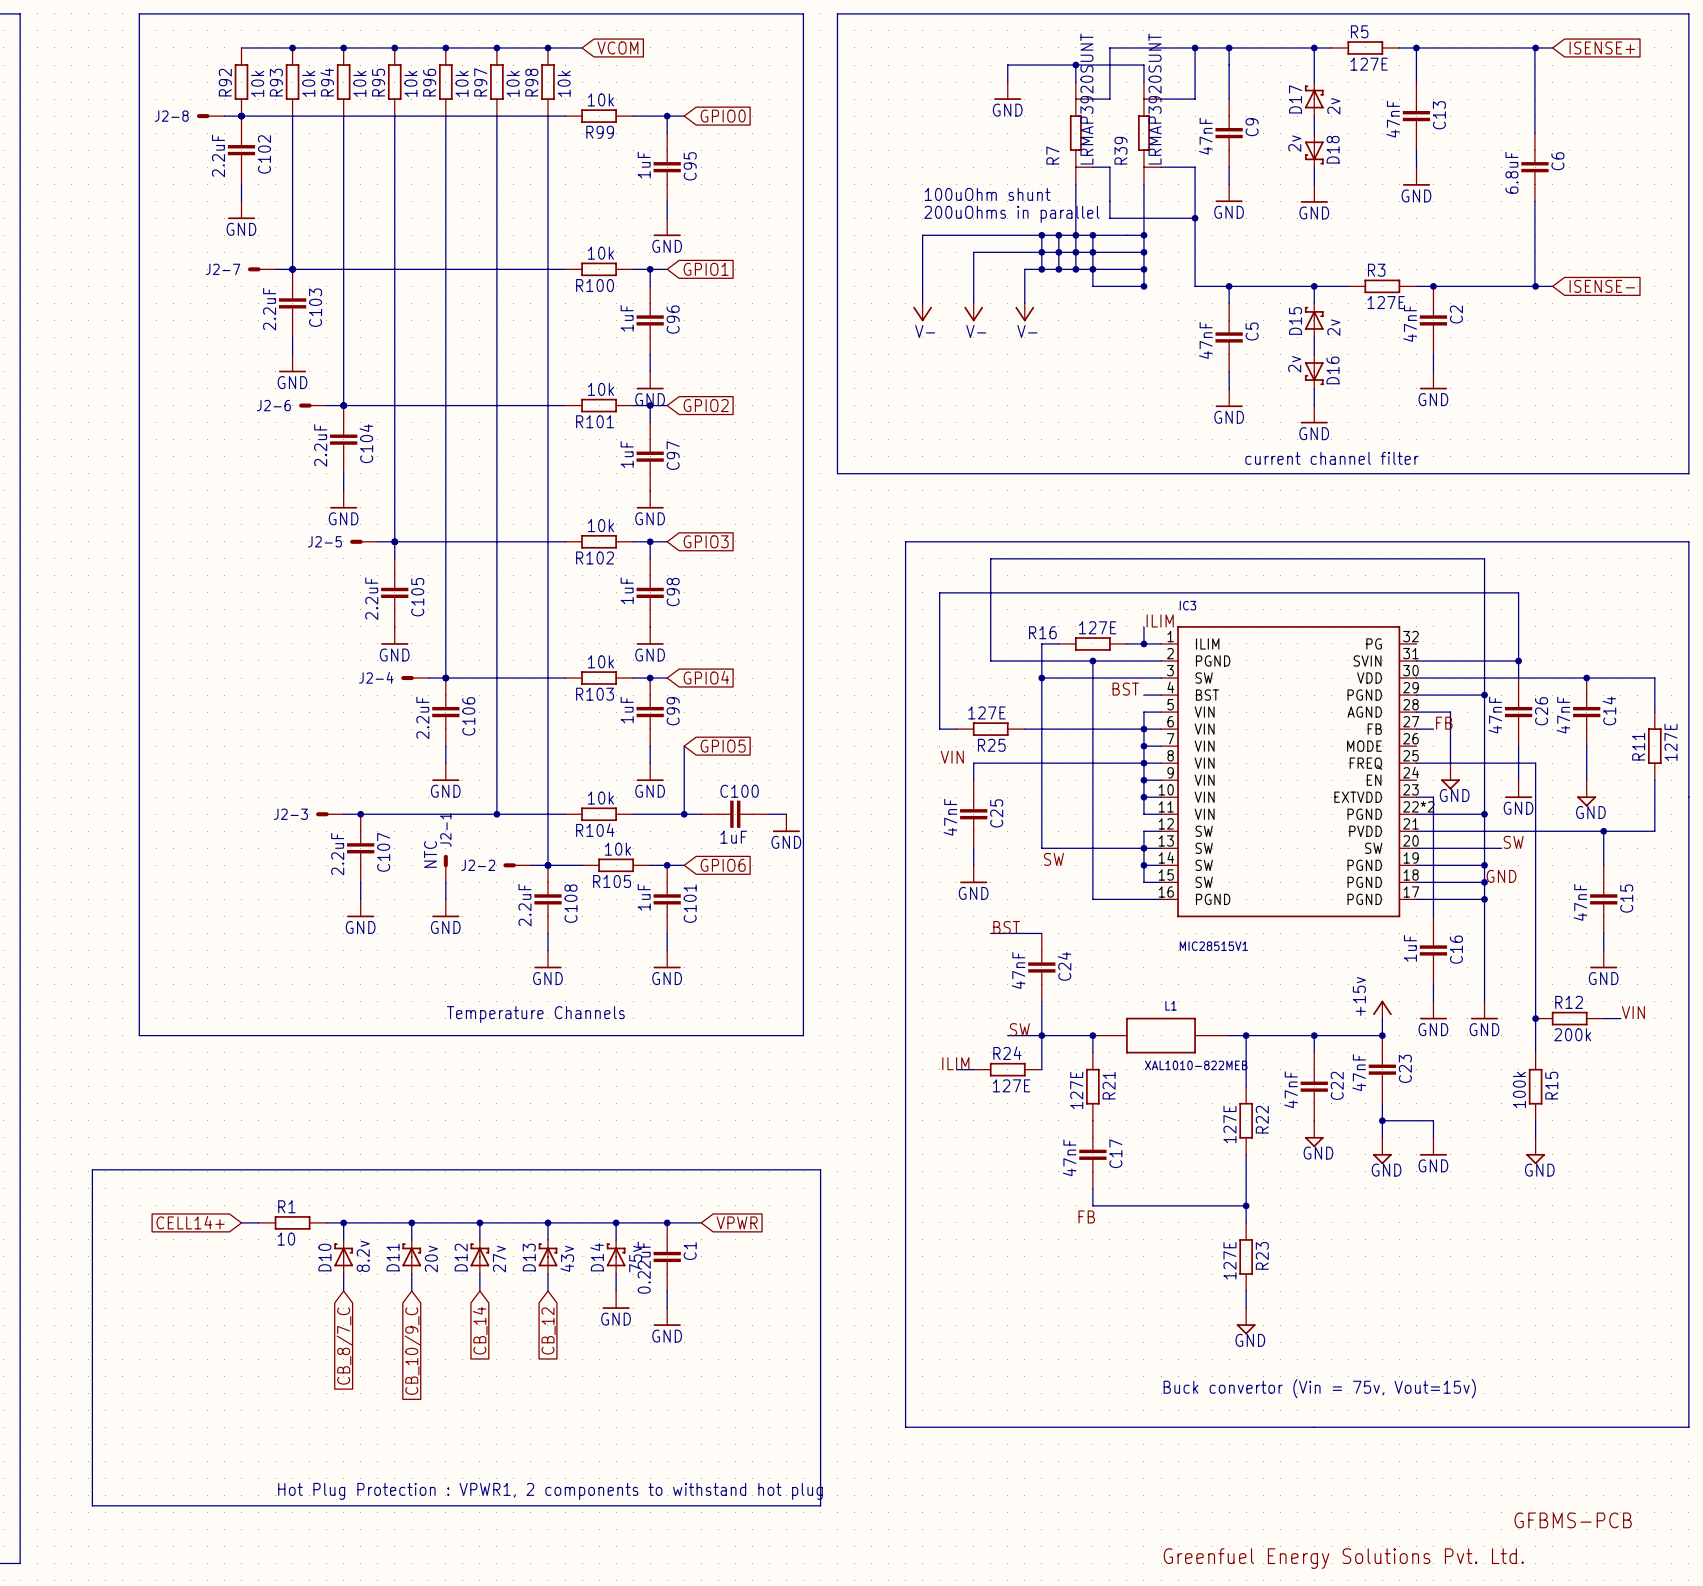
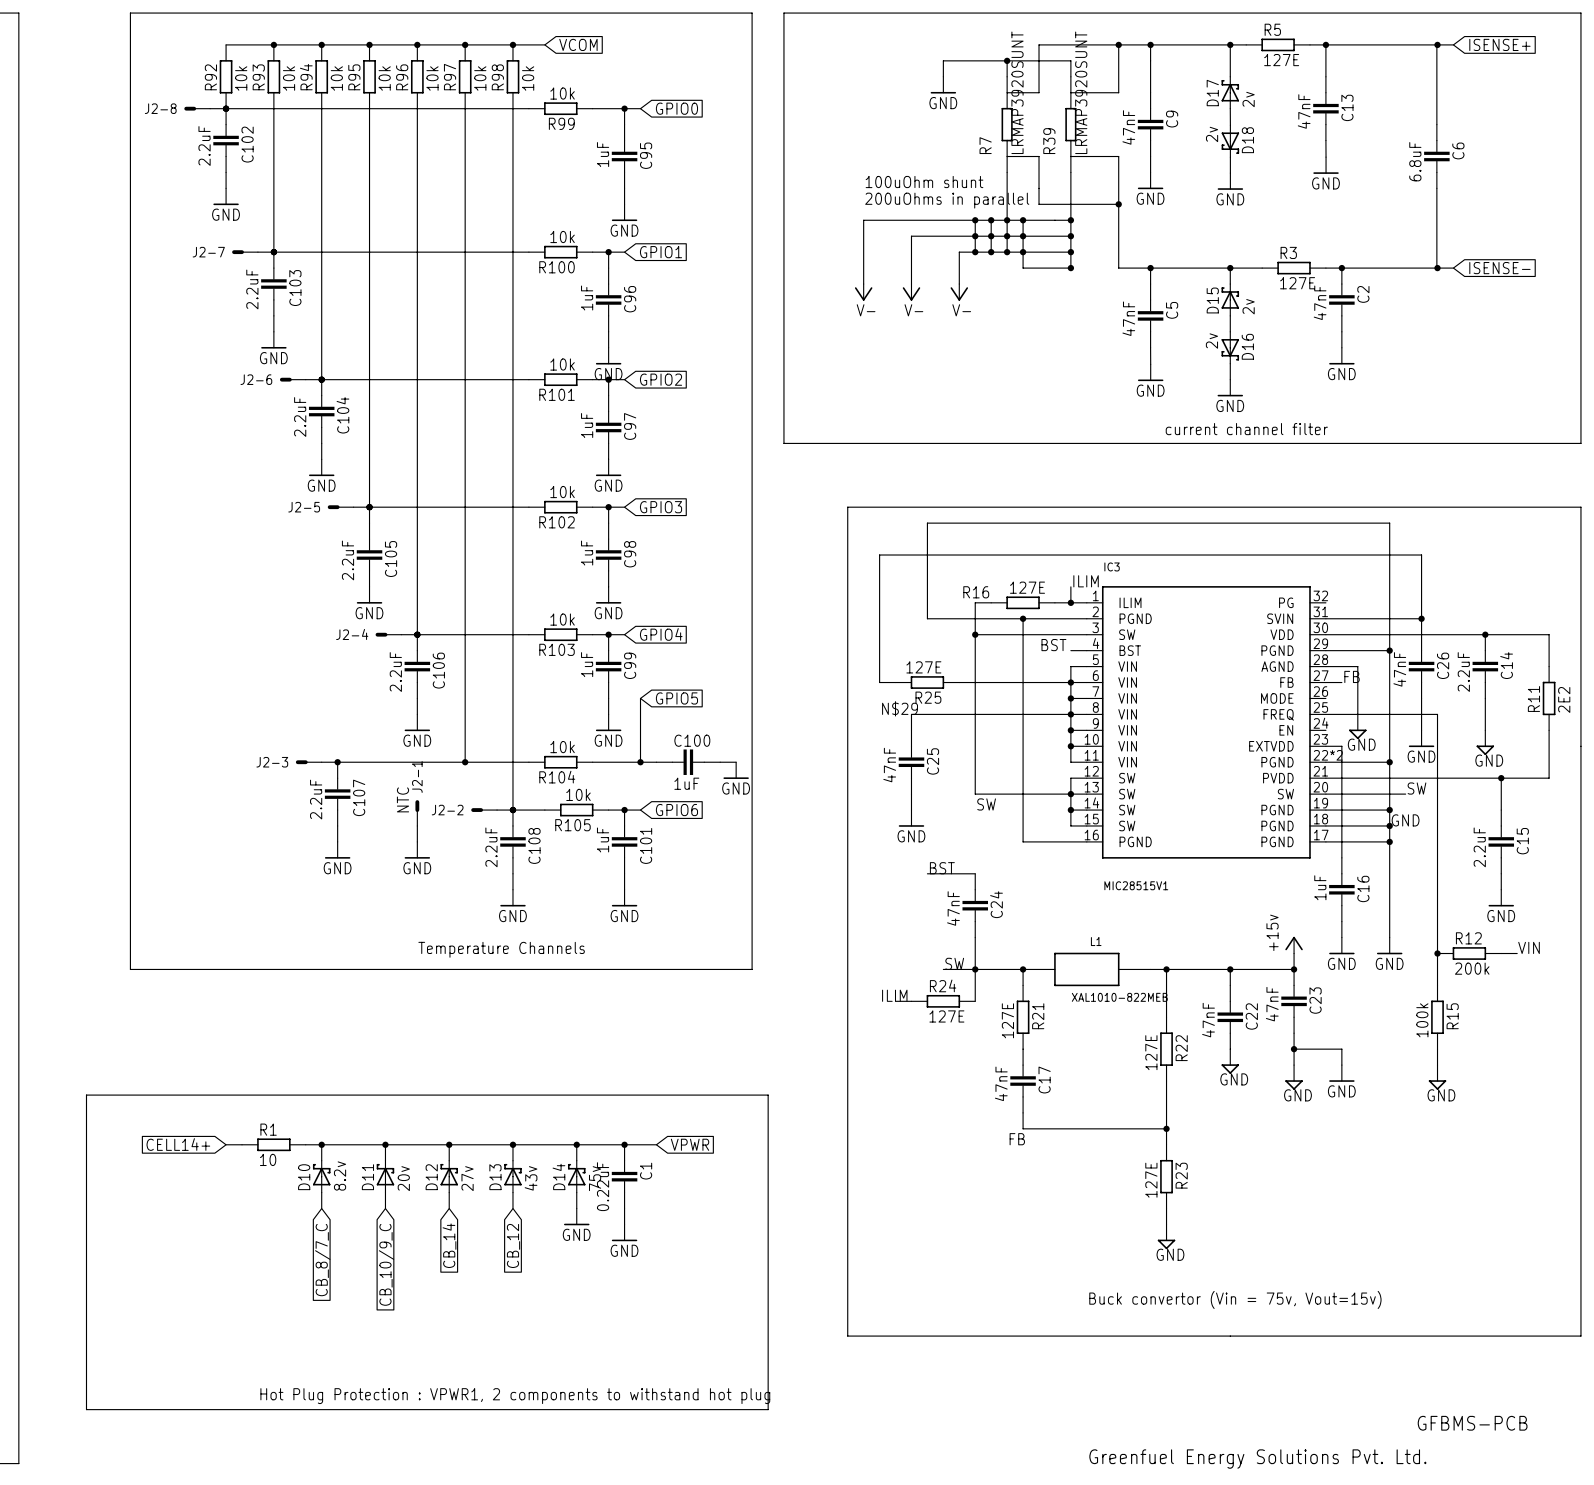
C14 value: 47nF (1563, 715) -> 2.2uF (1463, 672)
R11 value: 127E (1670, 742) -> 2E2 (1564, 699)
label: VIN (952, 757) -> N$29 (900, 708)
C15 value: 47nF (1580, 902) -> 2.2uF (1479, 847)

